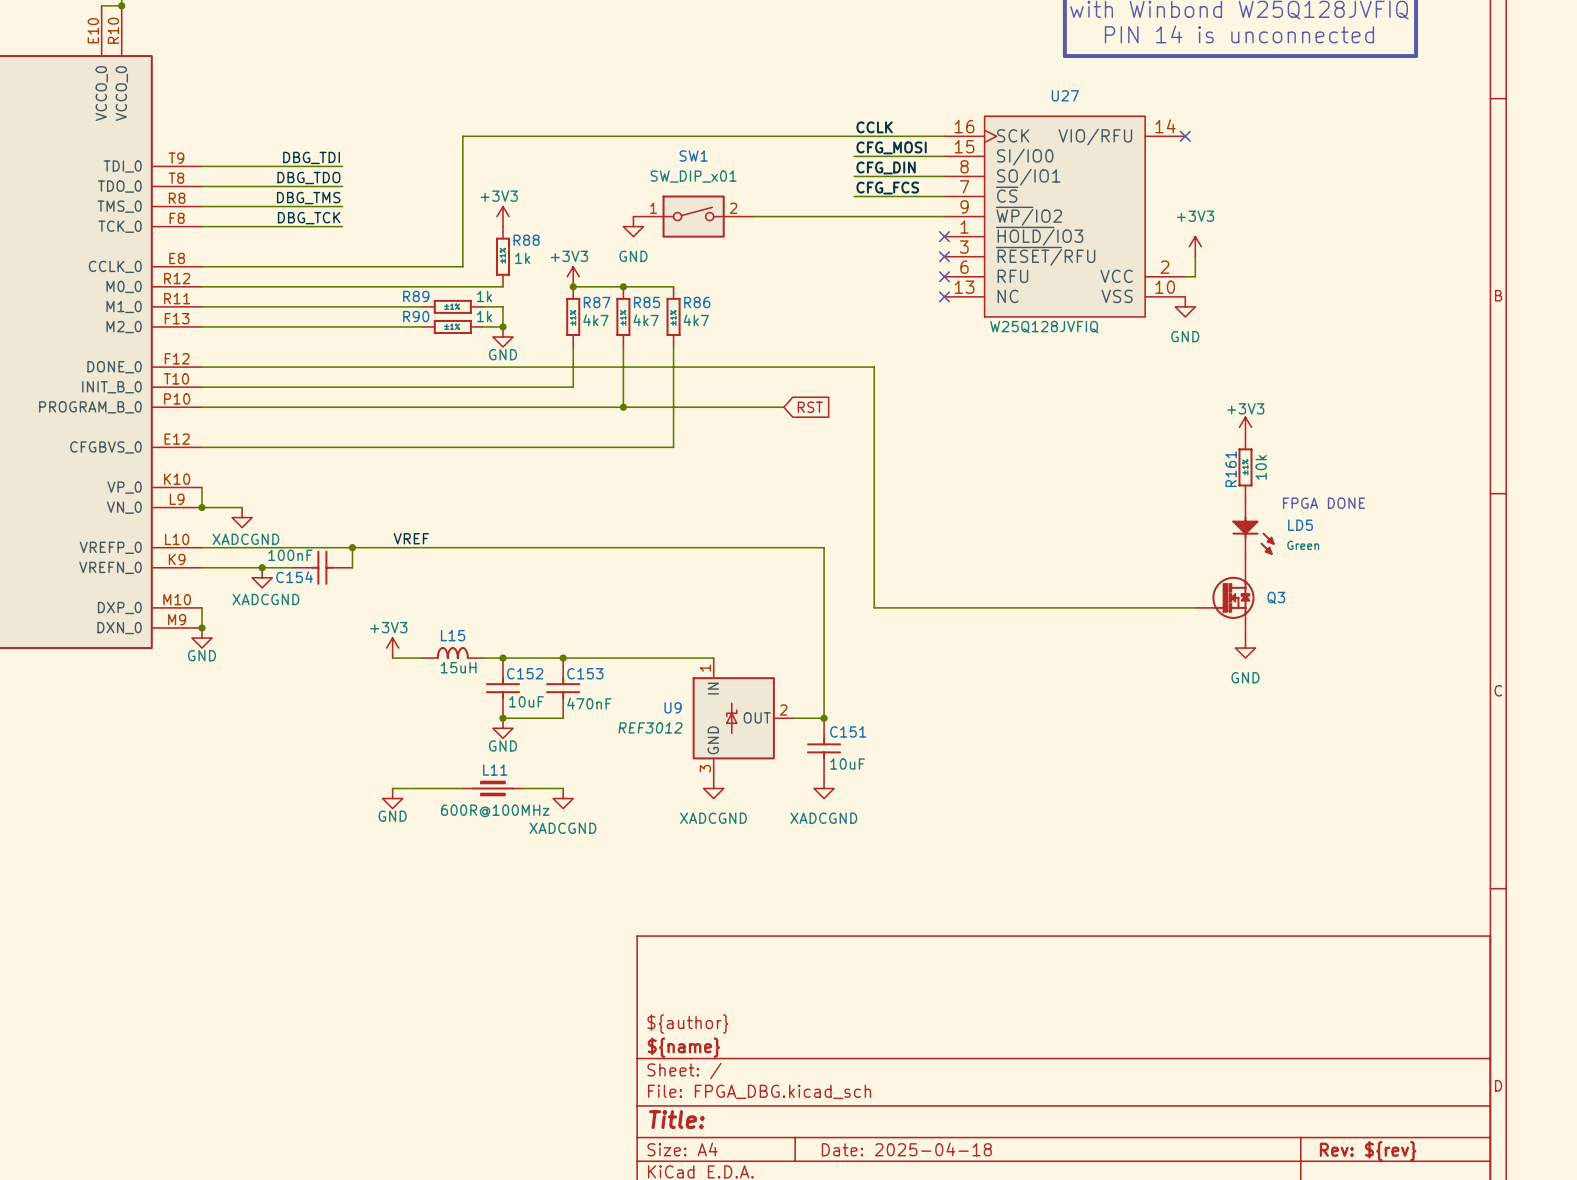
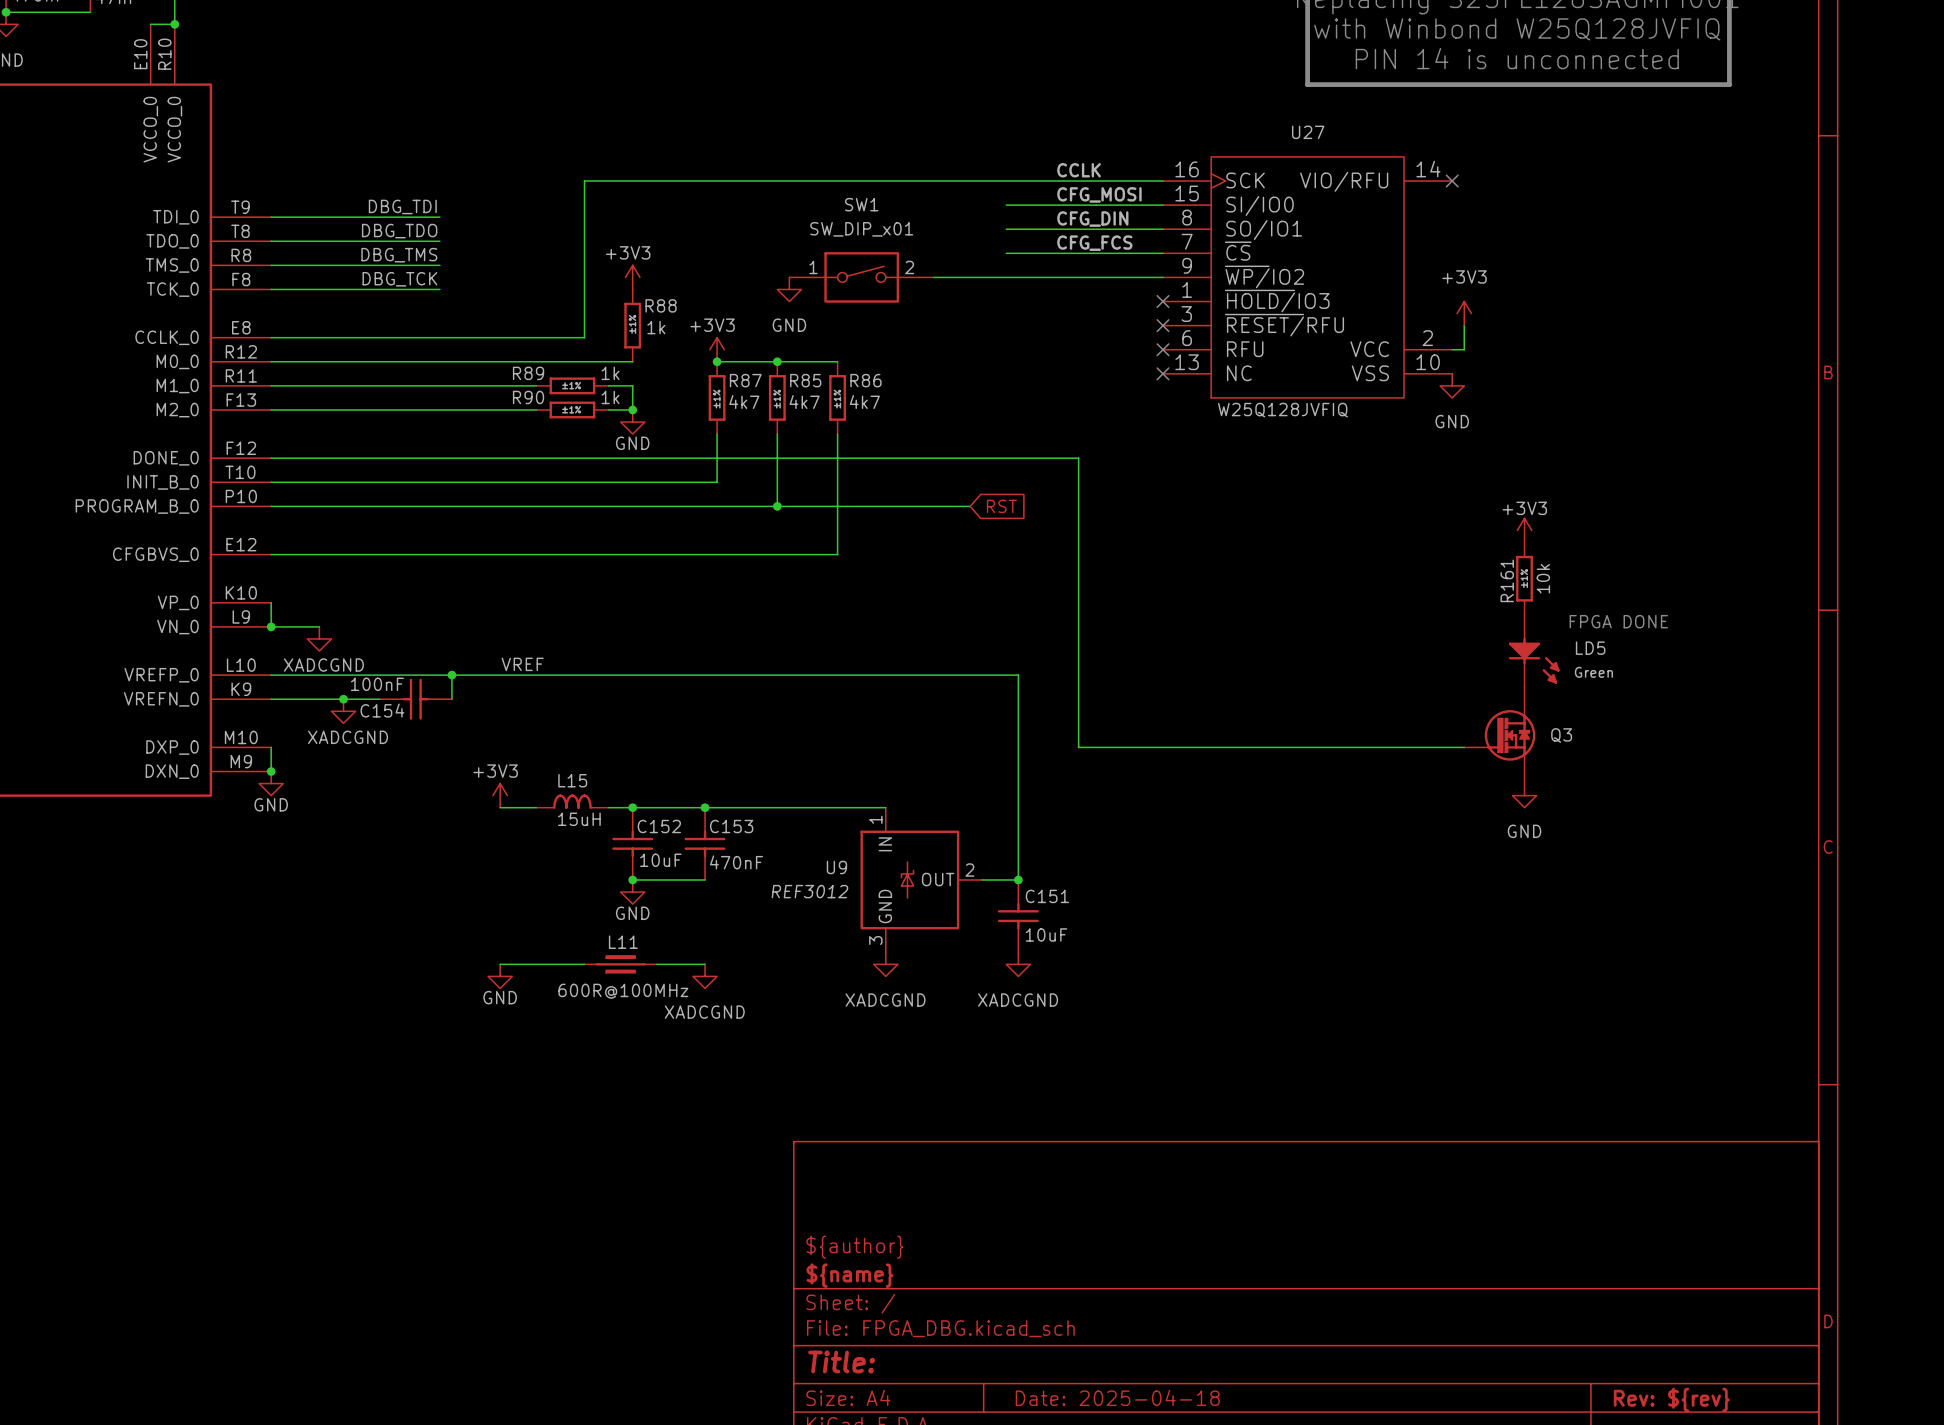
wire: none -> (1006, 205) (1054, 205)
wire: none -> (1006, 229) (1054, 229)
wire: none -> (1006, 253) (1054, 253)

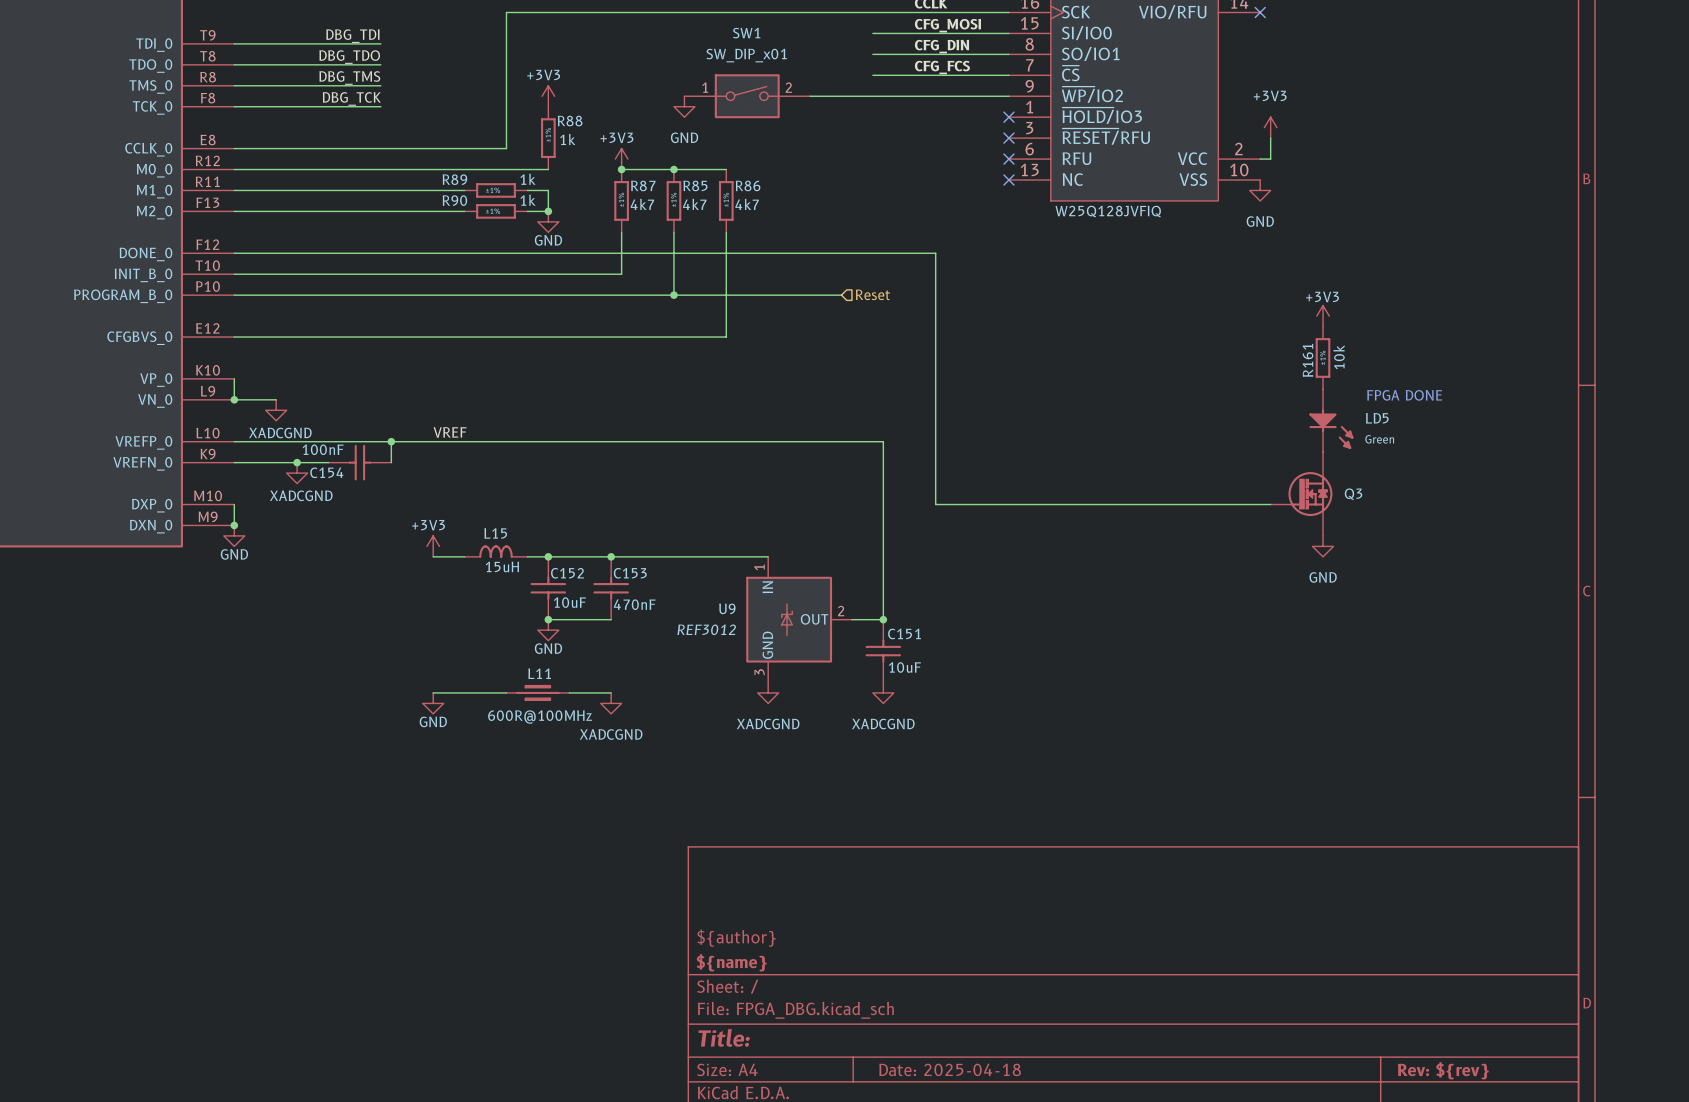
hierarchical label: none -> Reset (872, 294)
global label: RST (1001, 506) -> none

